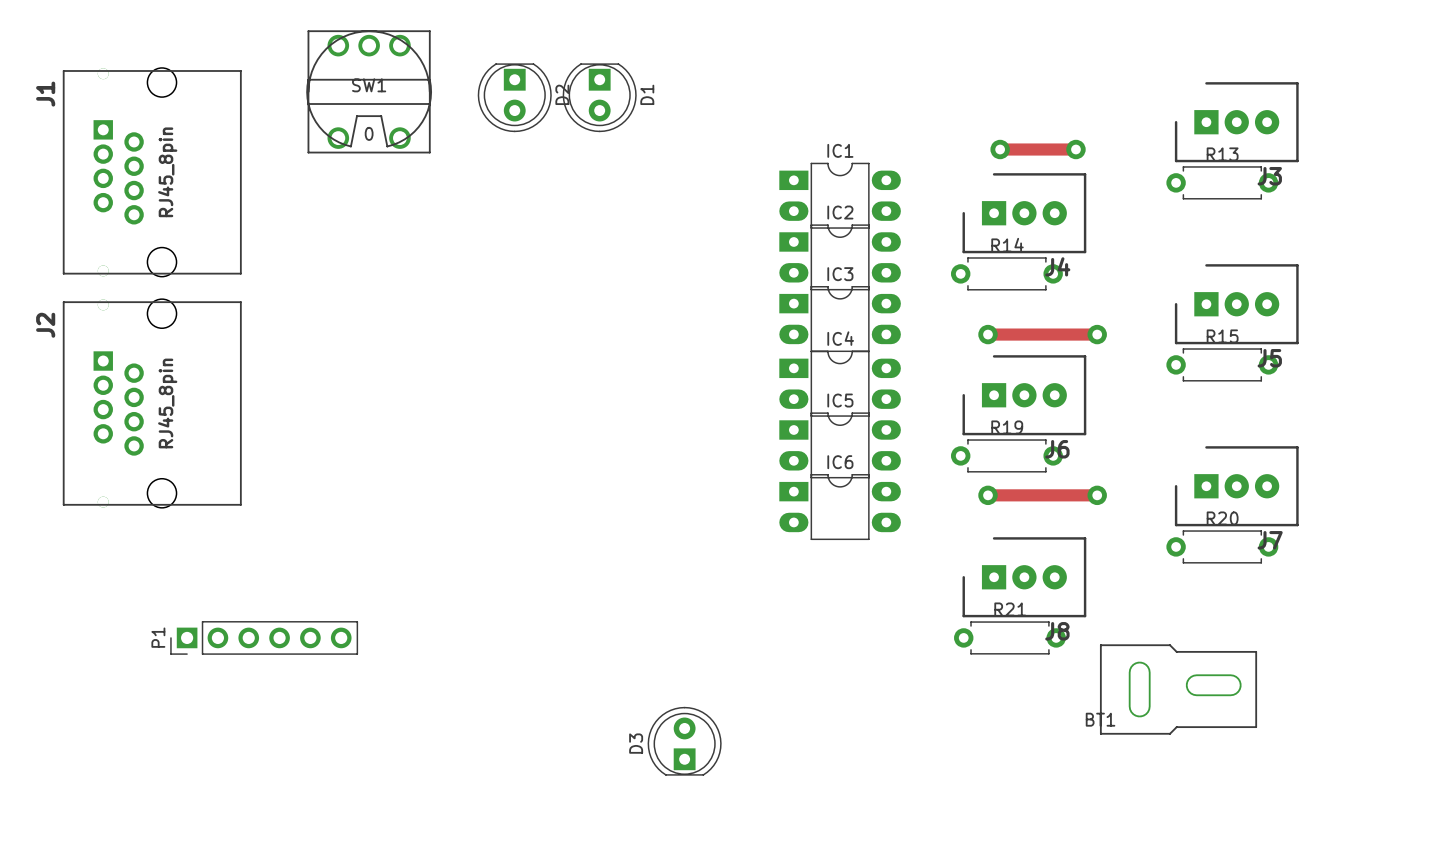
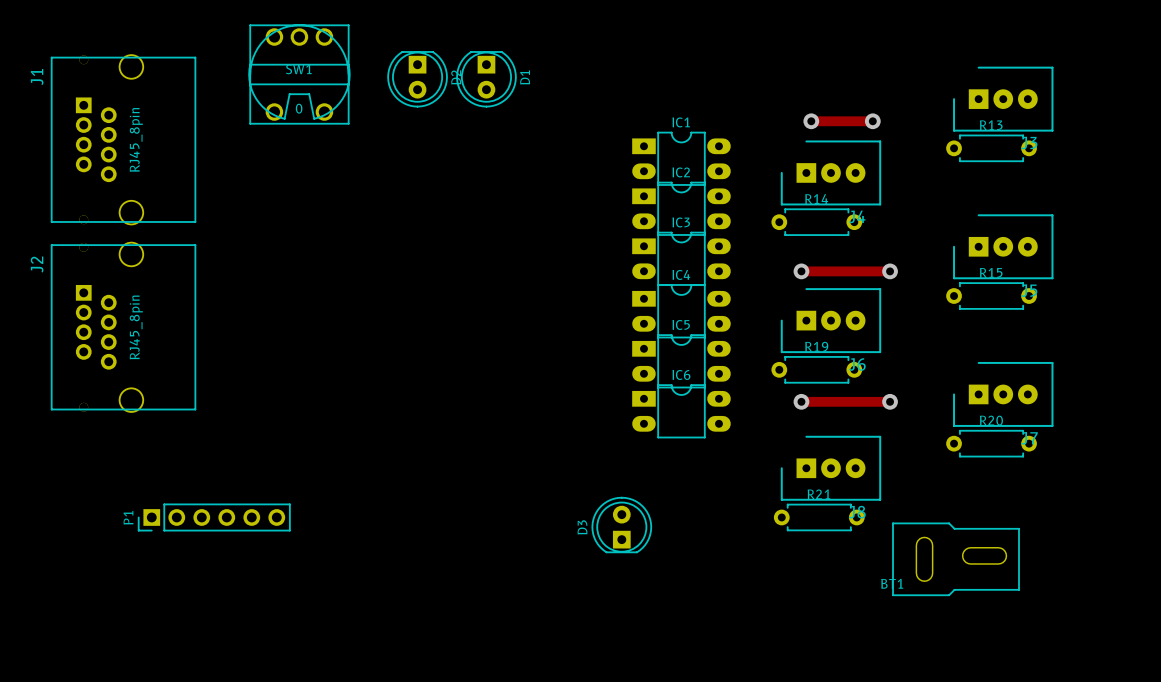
D3 position: (684, 741) -> (621, 525)

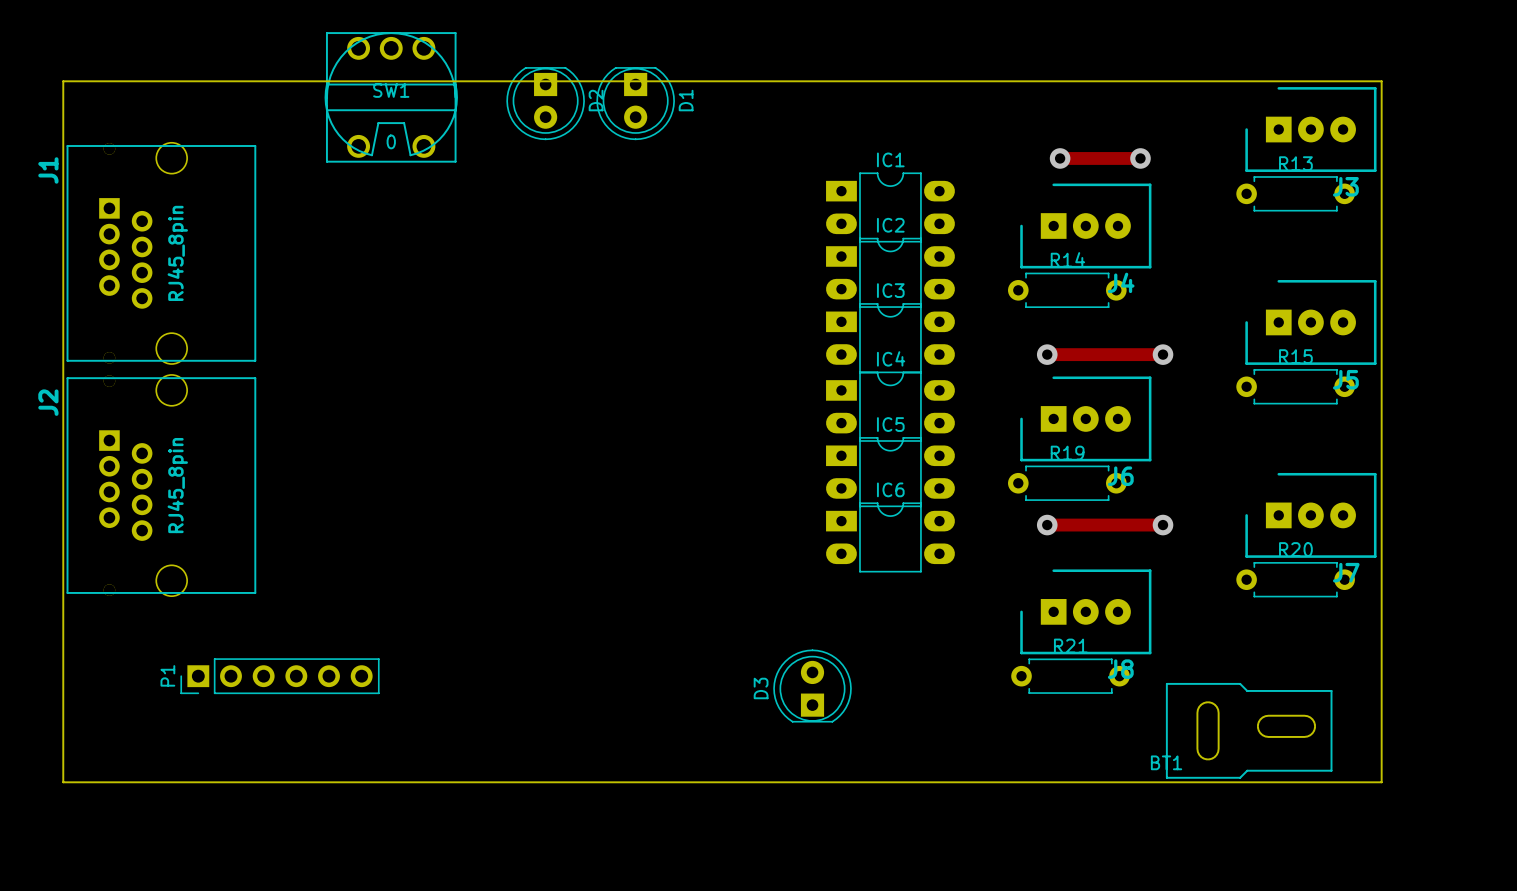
board edge: none -> (63, 81) (63, 782) (1381, 782) (1381, 81) (63, 81)
J1 position: (123, 139) -> (161, 253)
J2 position: (123, 327) -> (161, 485)

